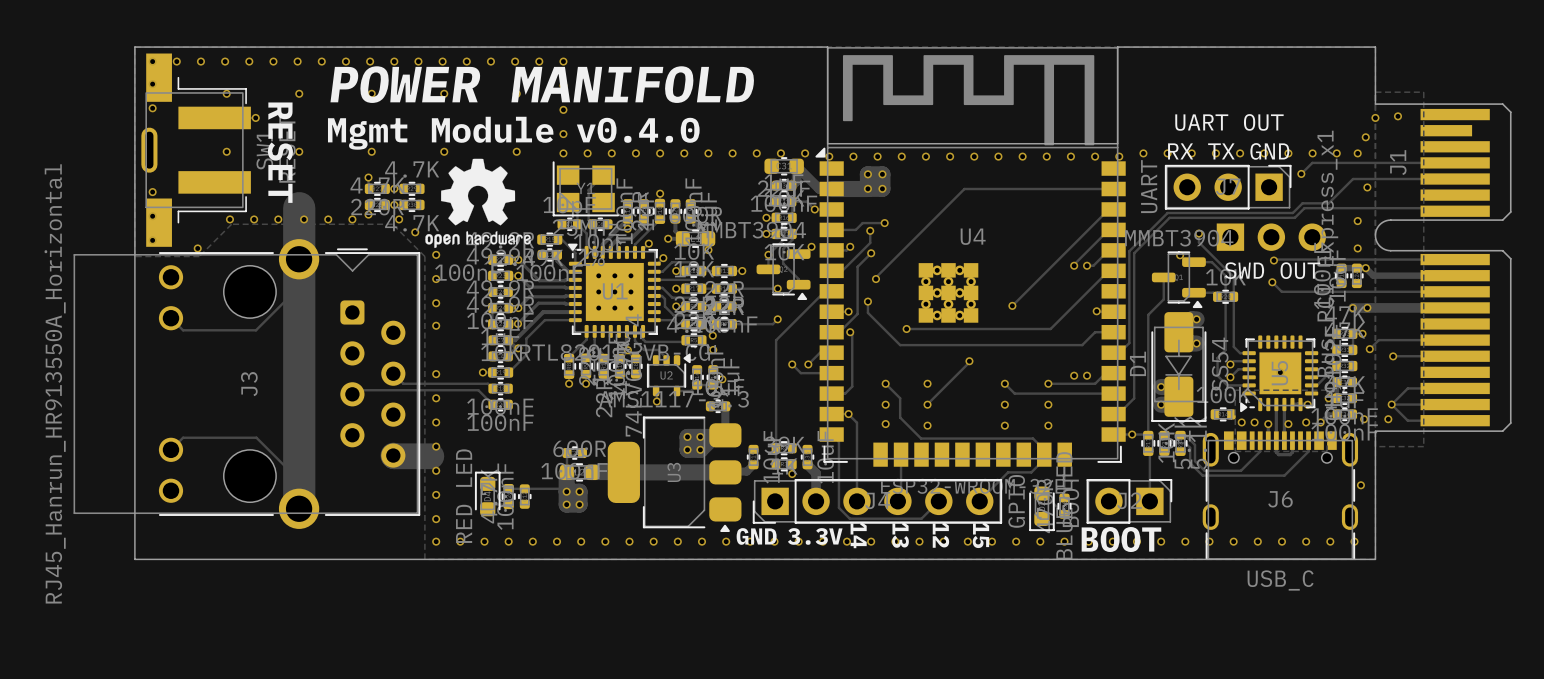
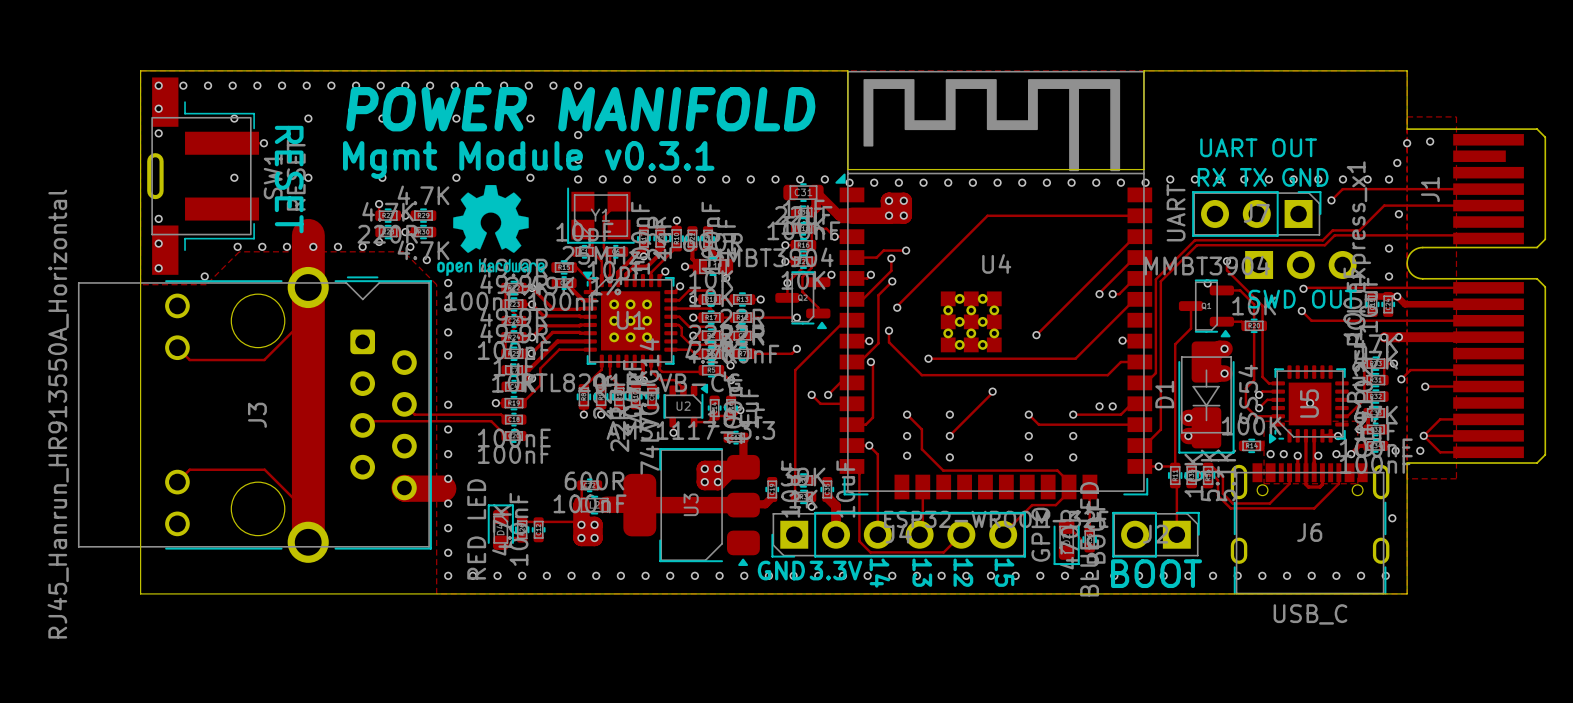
text: Mgmt Module v0.4.0 (513, 133) -> Mgmt Module v0.3.1 (528, 159)

